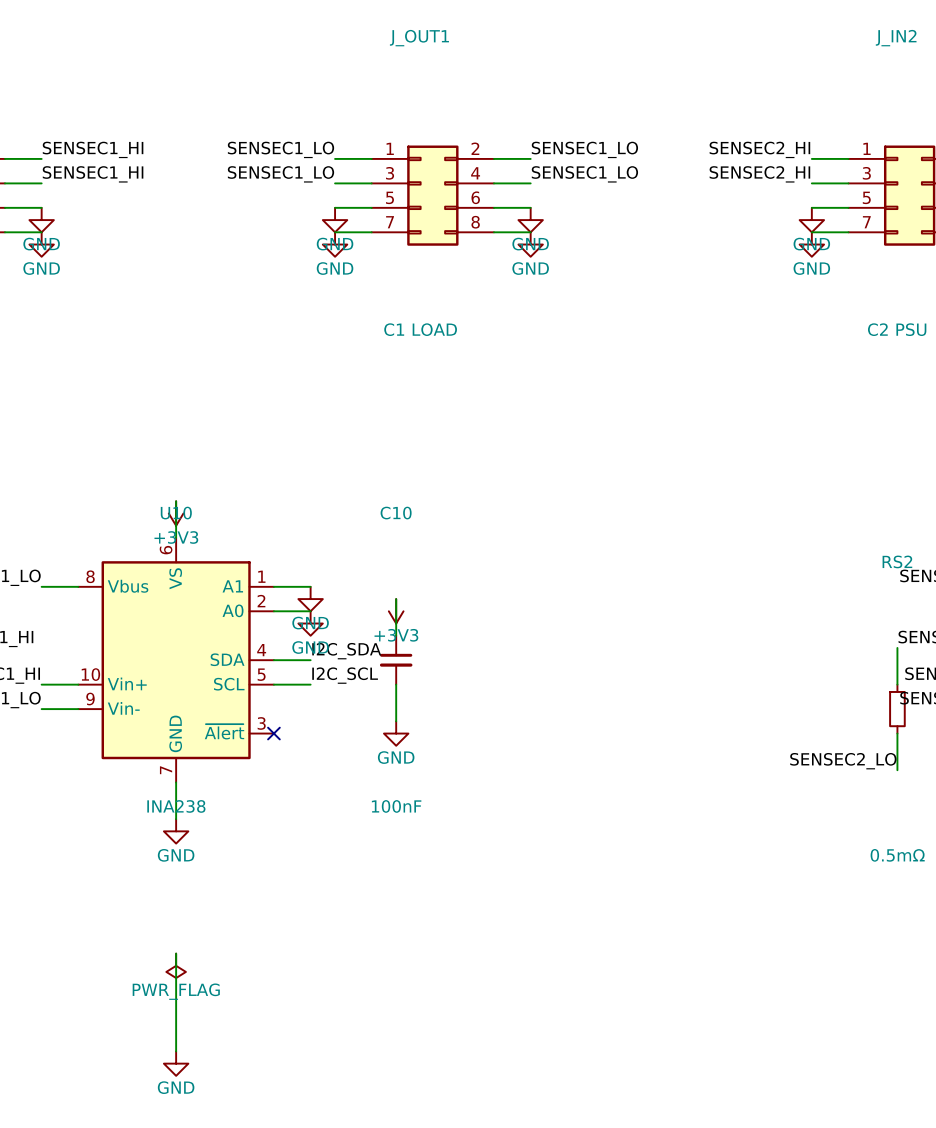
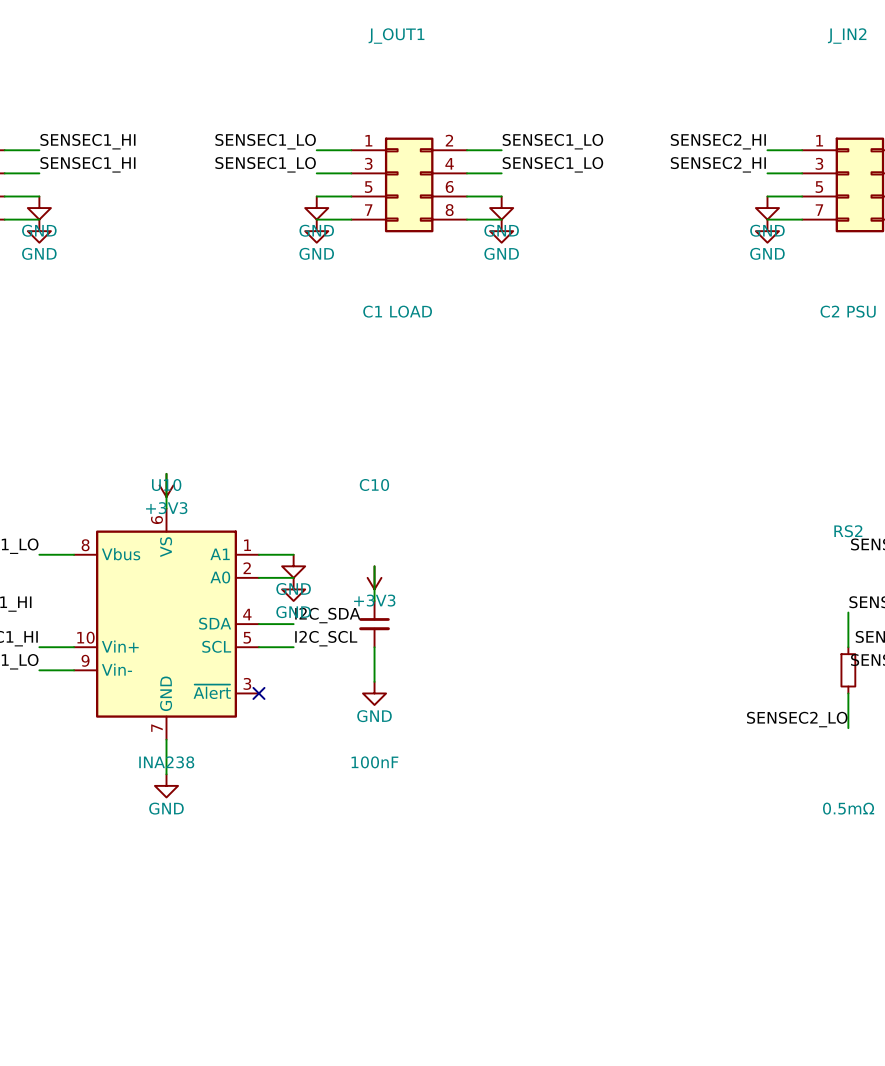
wire: (176, 953) (176, 1051) -> none
power symbol: PWR_FLAG (176, 965) -> none
power symbol: GND (176, 1063) -> none

